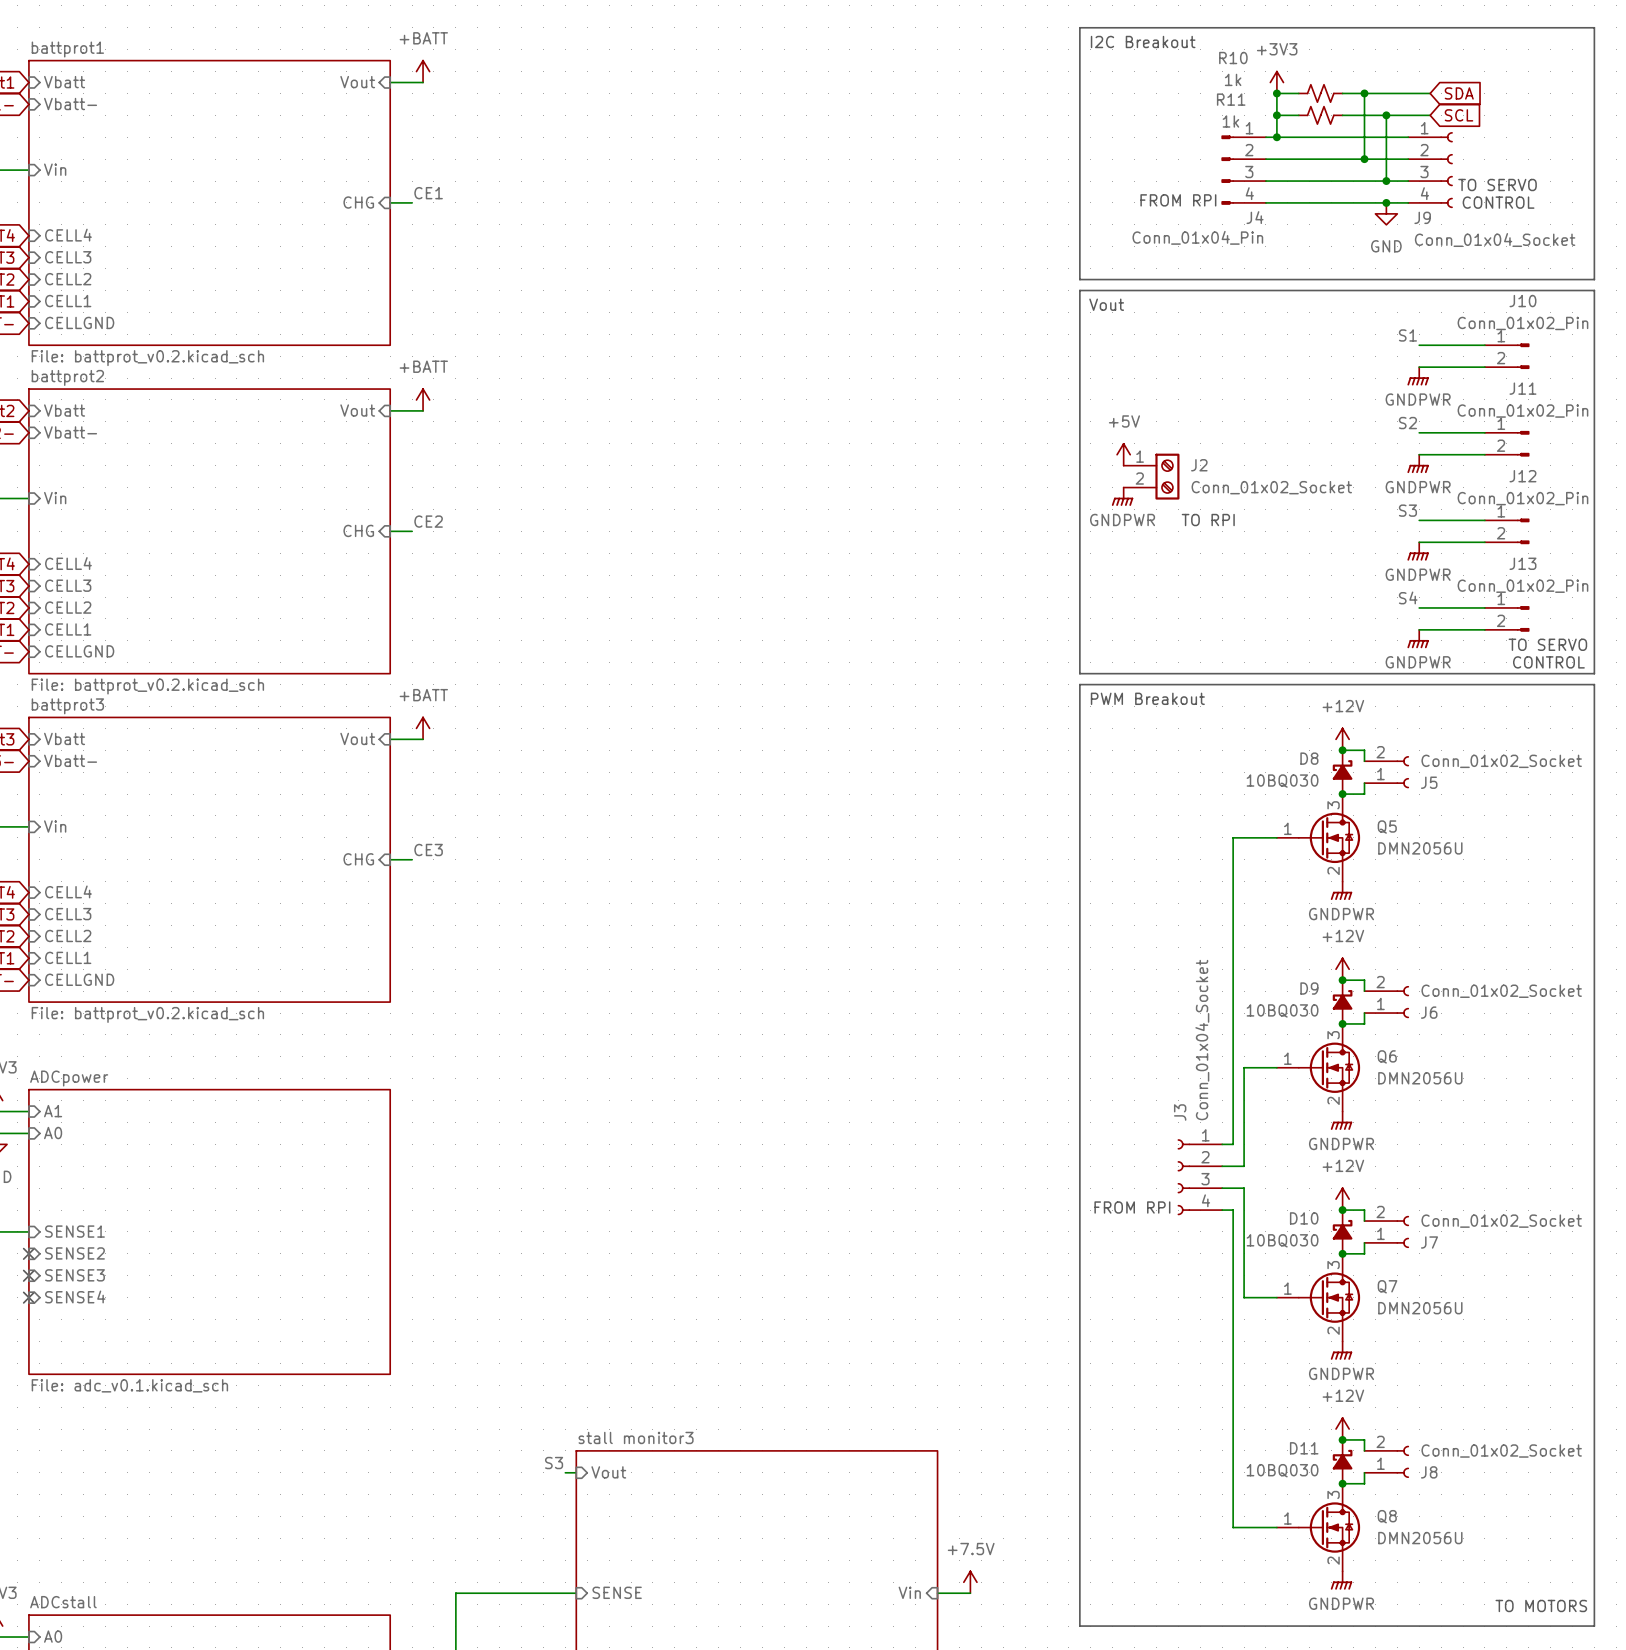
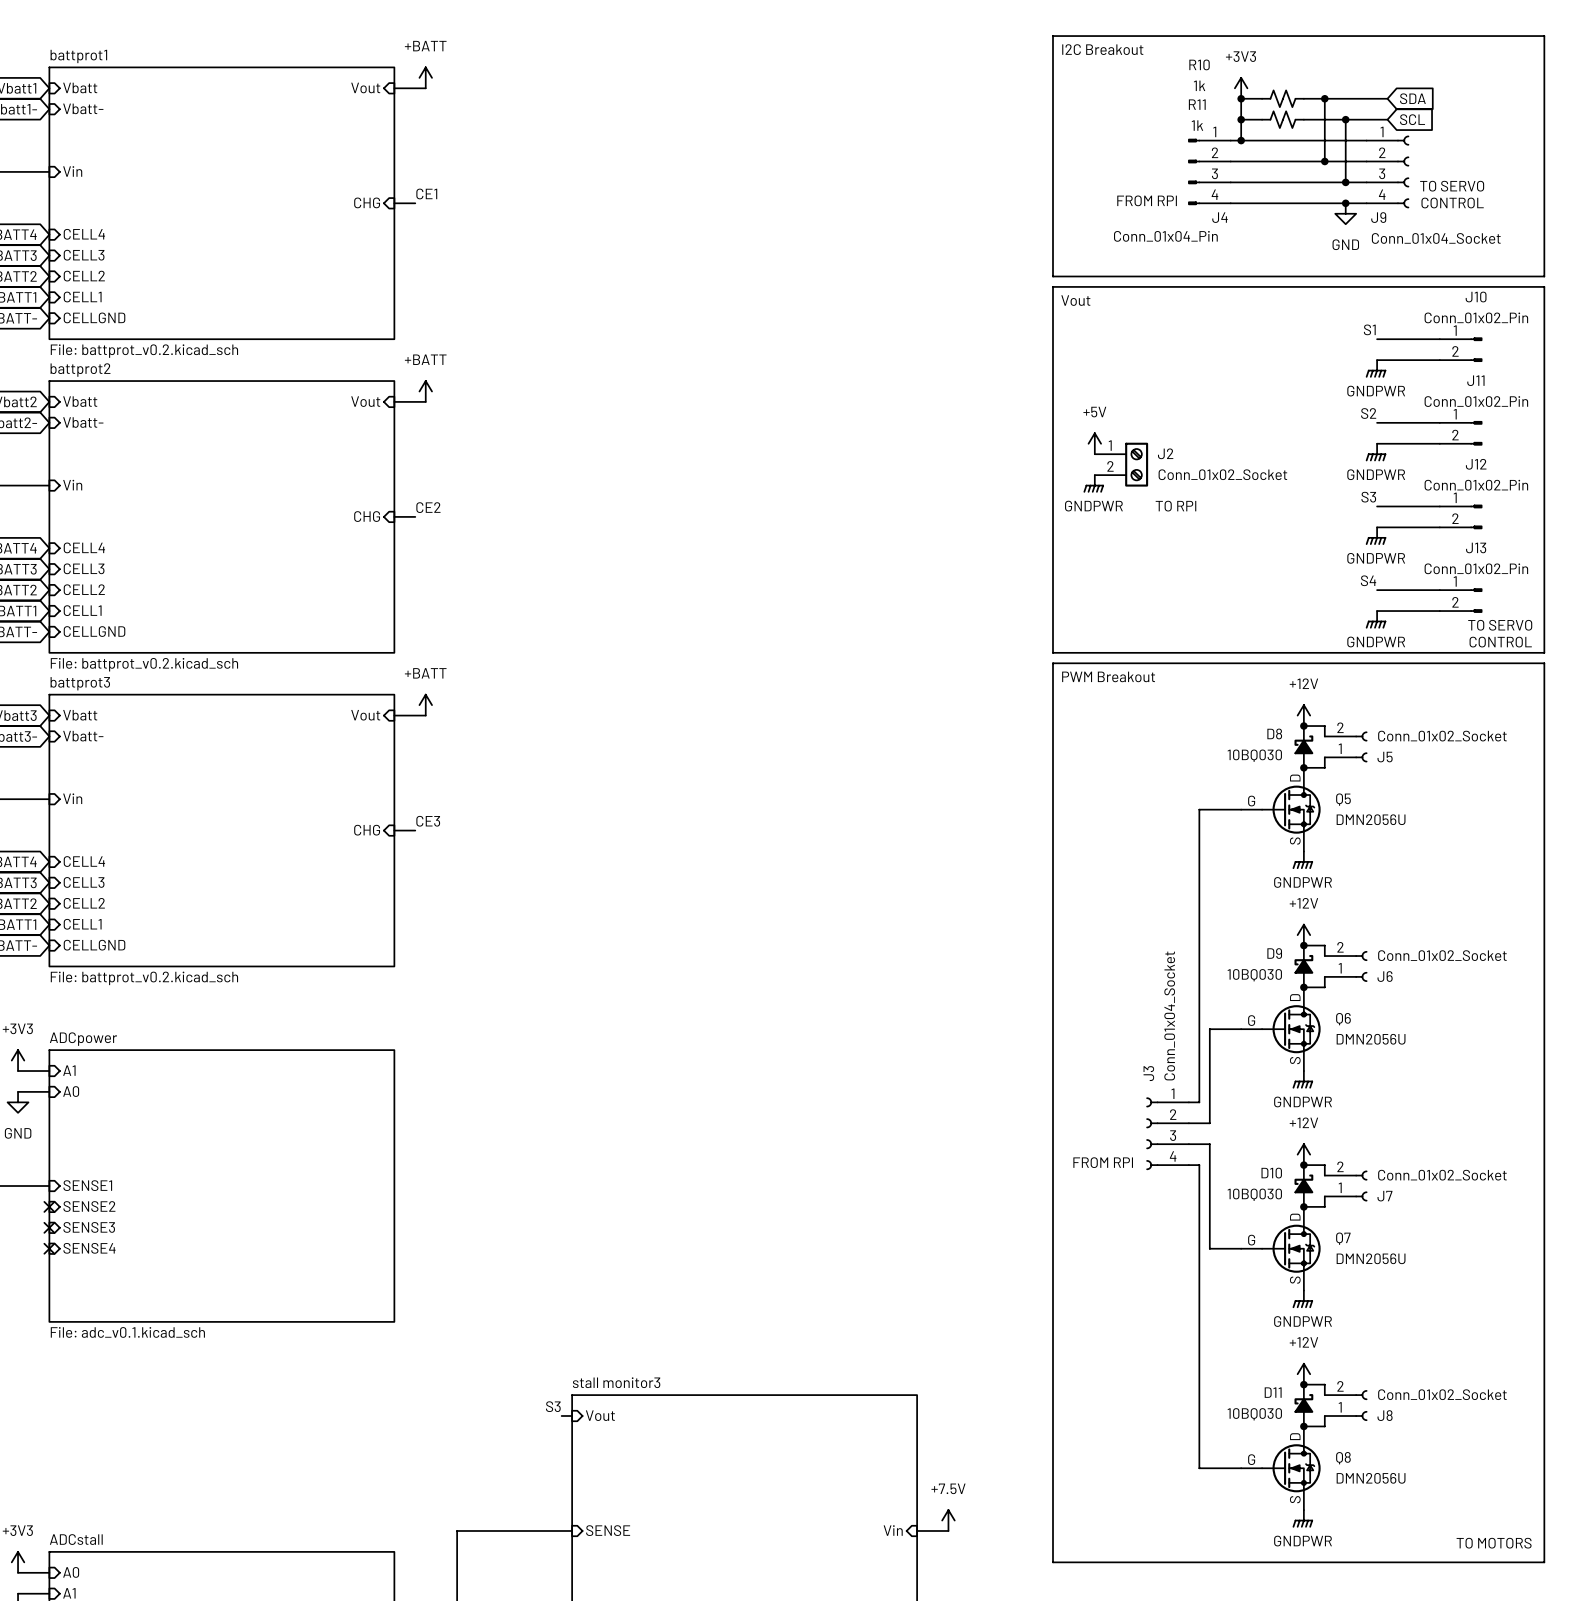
Q5 symbol: [1276, 794, 1361, 882] -> [1241, 767, 1321, 852]
Q6 symbol: [1276, 1023, 1361, 1112] -> [1241, 987, 1321, 1072]
Q7 symbol: [1276, 1253, 1361, 1342] -> [1241, 1206, 1321, 1291]
Q8 symbol: [1276, 1483, 1361, 1572] -> [1241, 1426, 1321, 1511]

